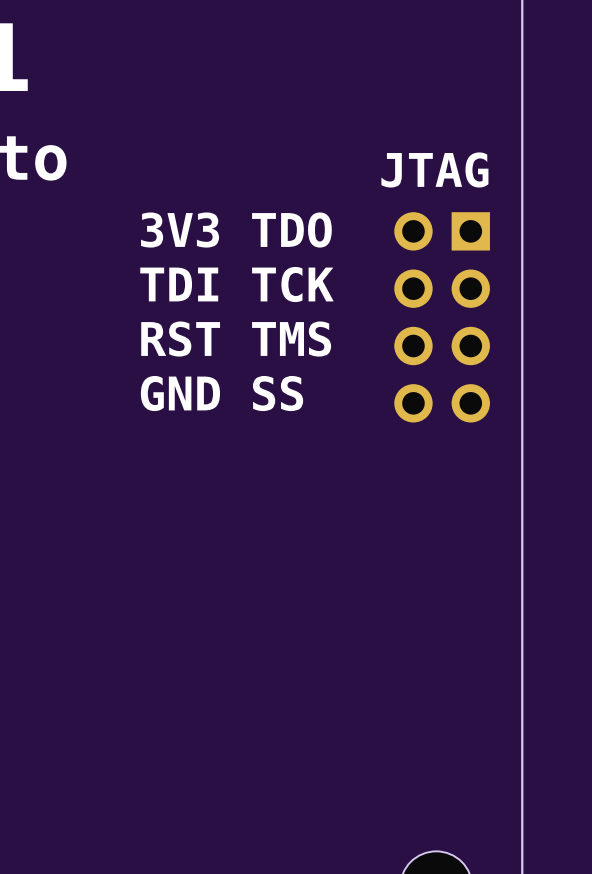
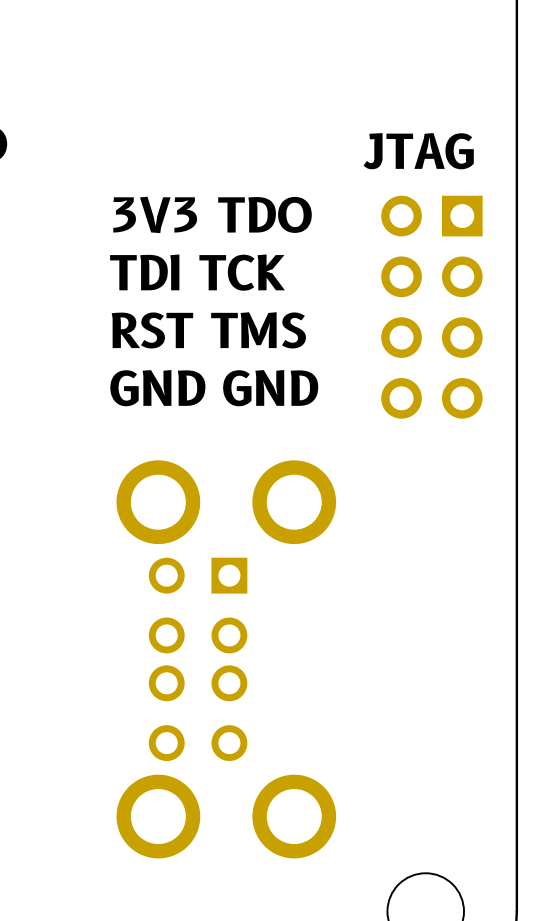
text: GND SS (222, 393) -> GND GND (214, 388)
part: none -> (226, 659)

